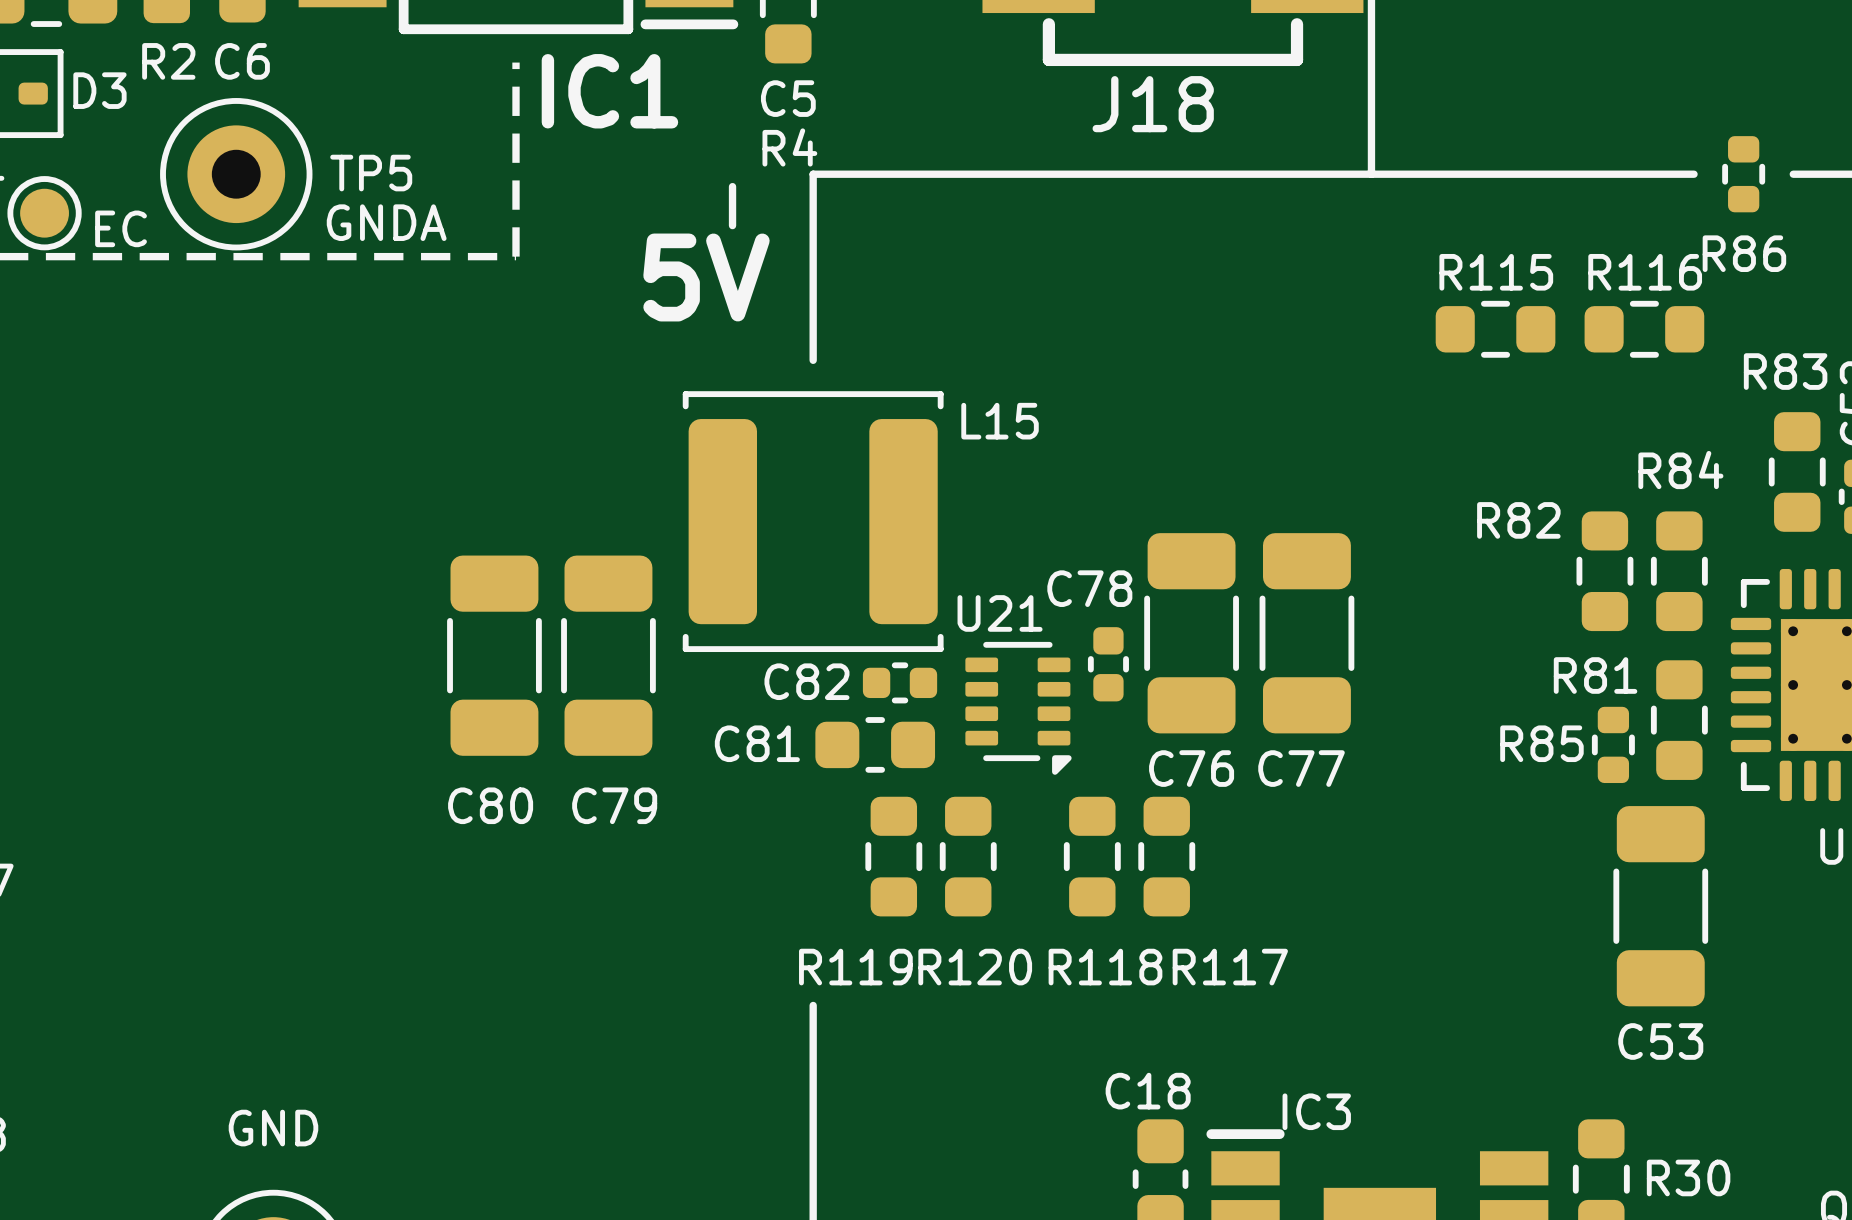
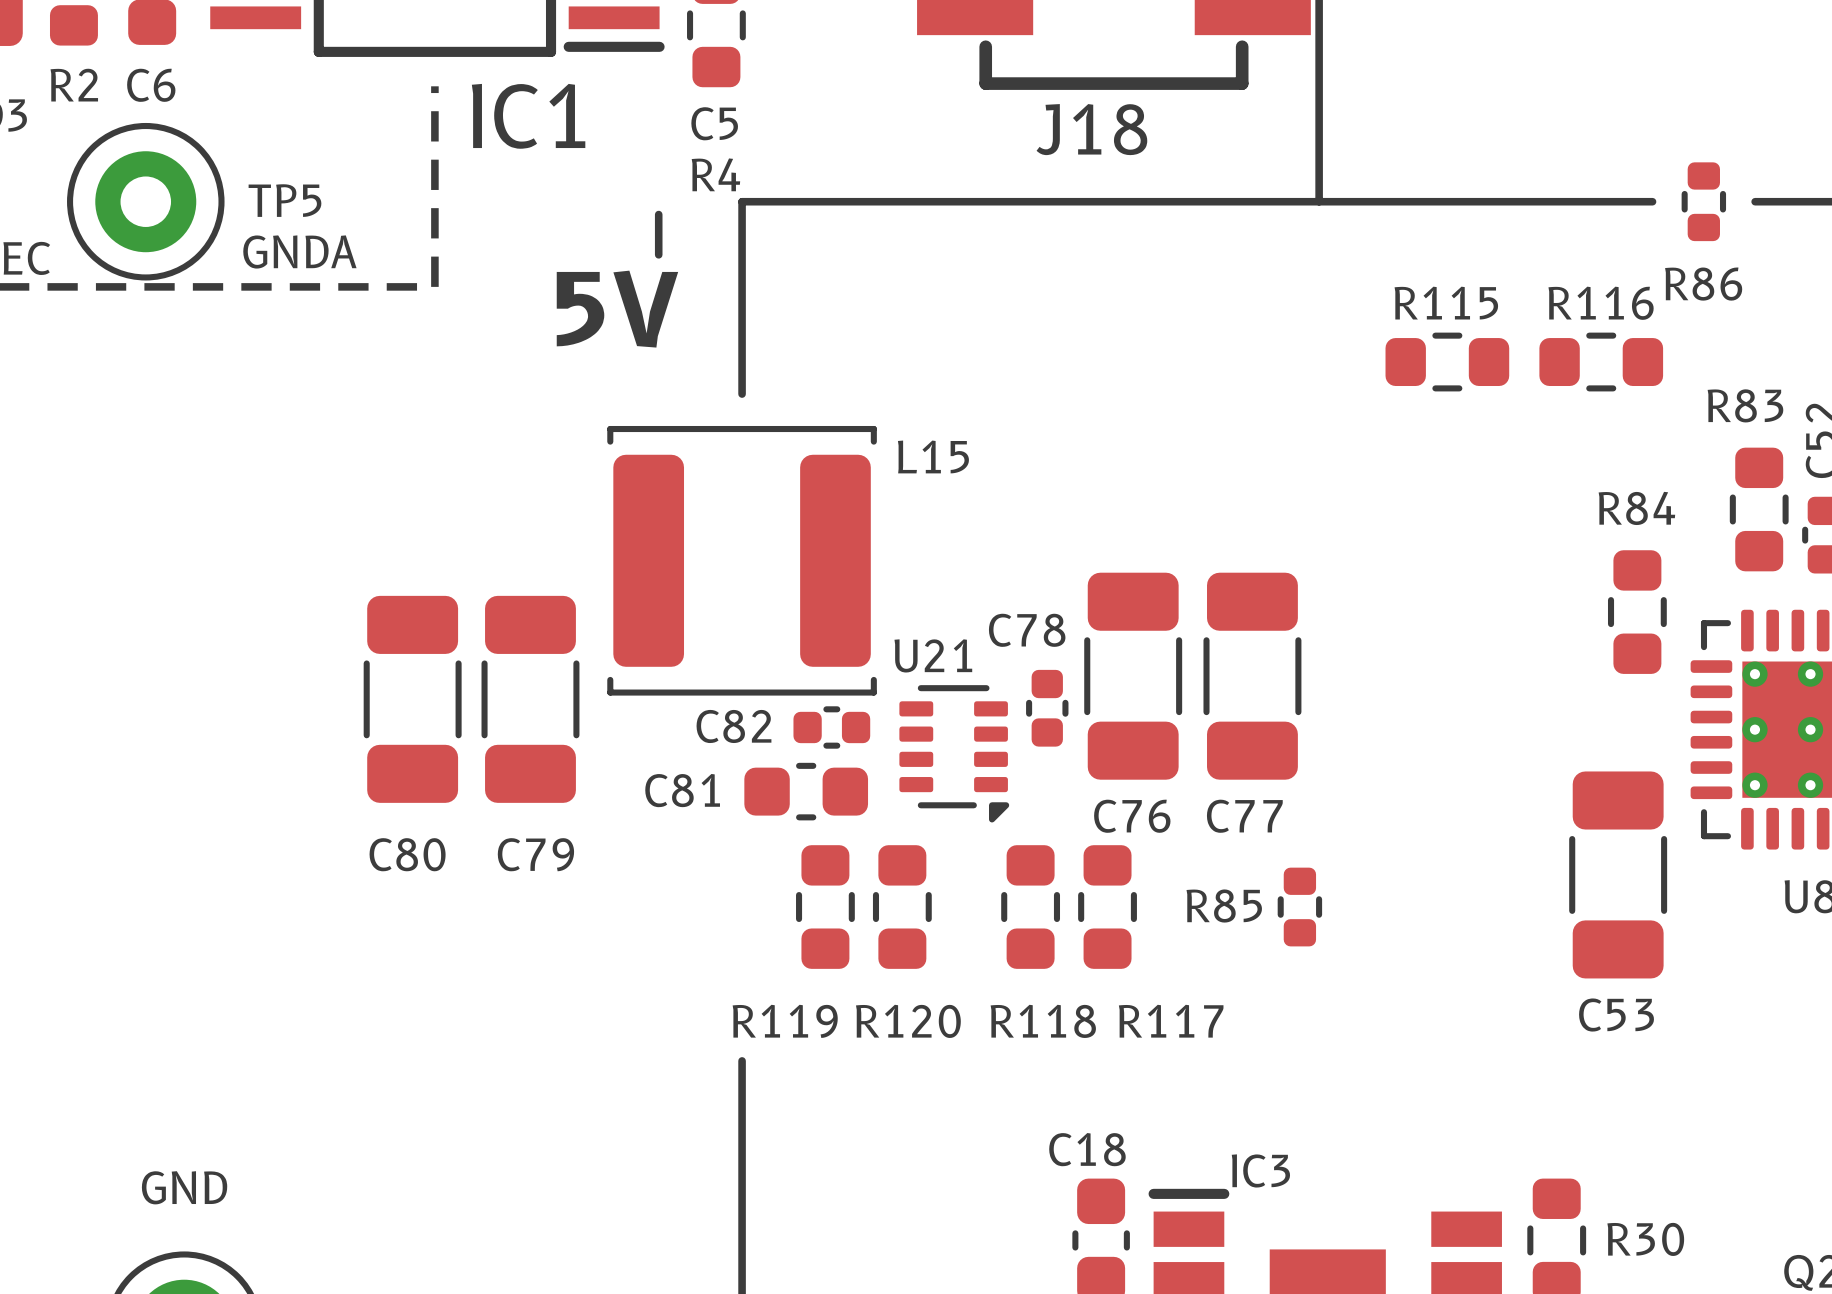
R82: (1604, 571) -> none
R81: (1679, 720) -> none
R85 position: (1613, 744) -> (1299, 907)
C53 position: (1660, 906) -> (1618, 874)

